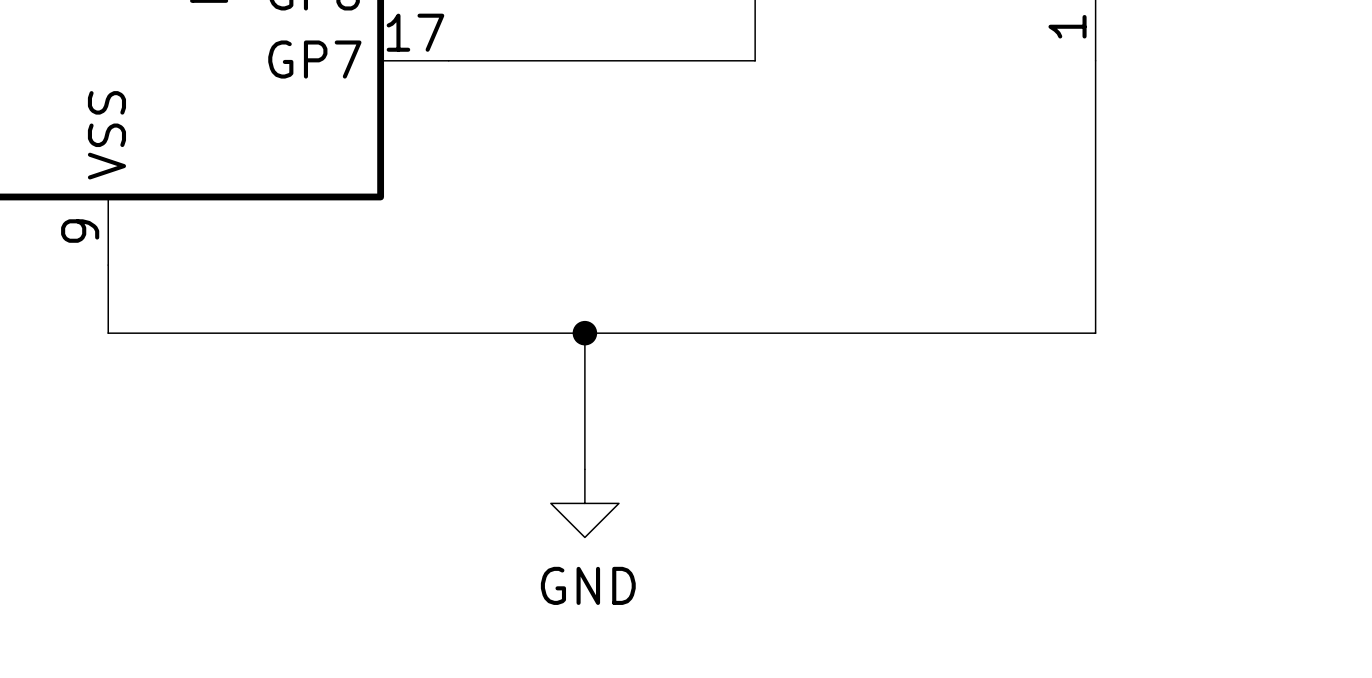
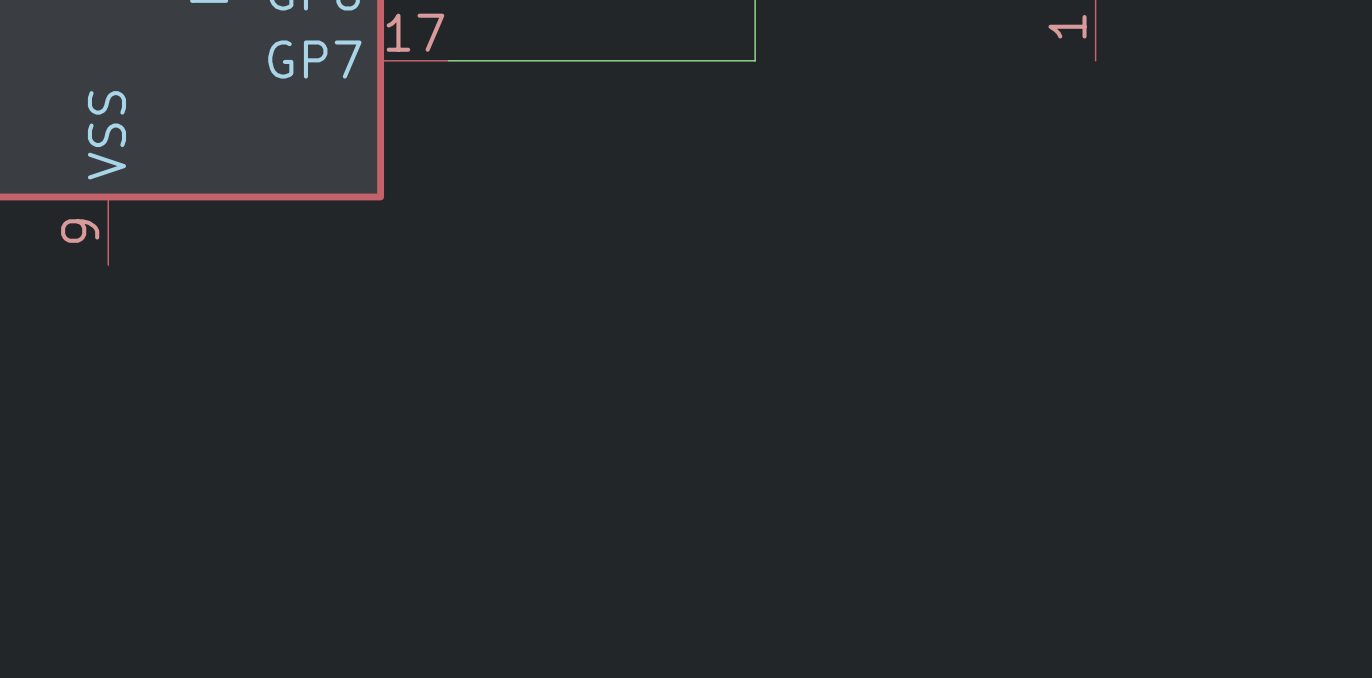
wire: (1095, 60) (1095, 333) (108, 333) (108, 265) -> none
wire: (584, 333) (584, 469) -> none
junction: (584, 333) -> none
power symbol: GND (584, 503) -> none

